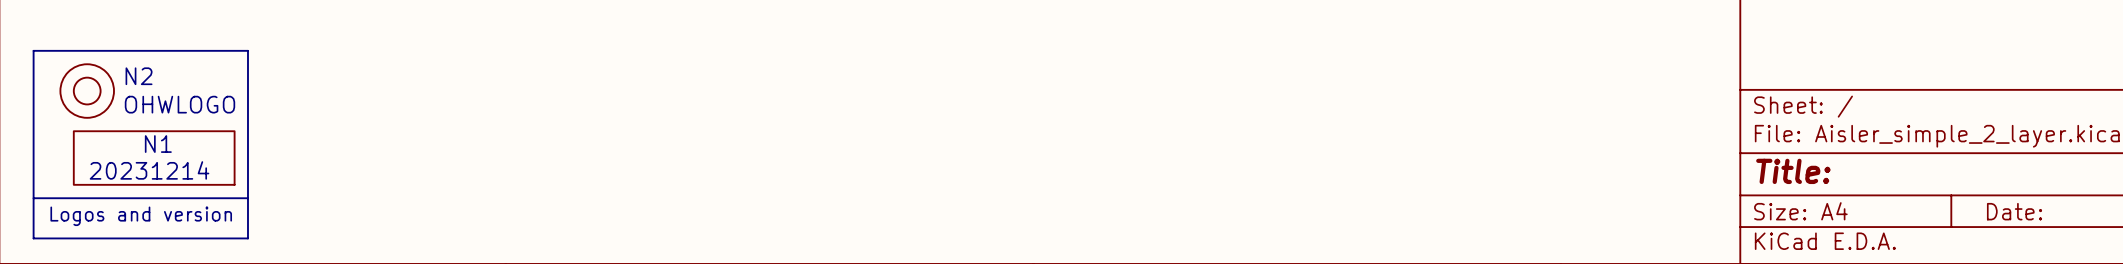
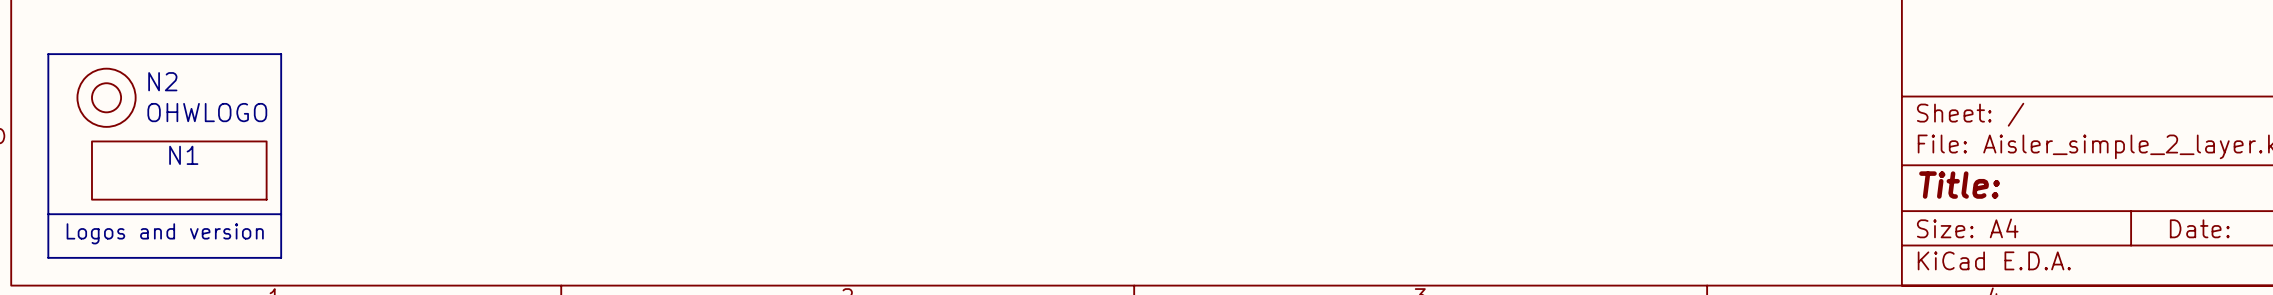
N1 value: 20231214 (149, 170) -> none

